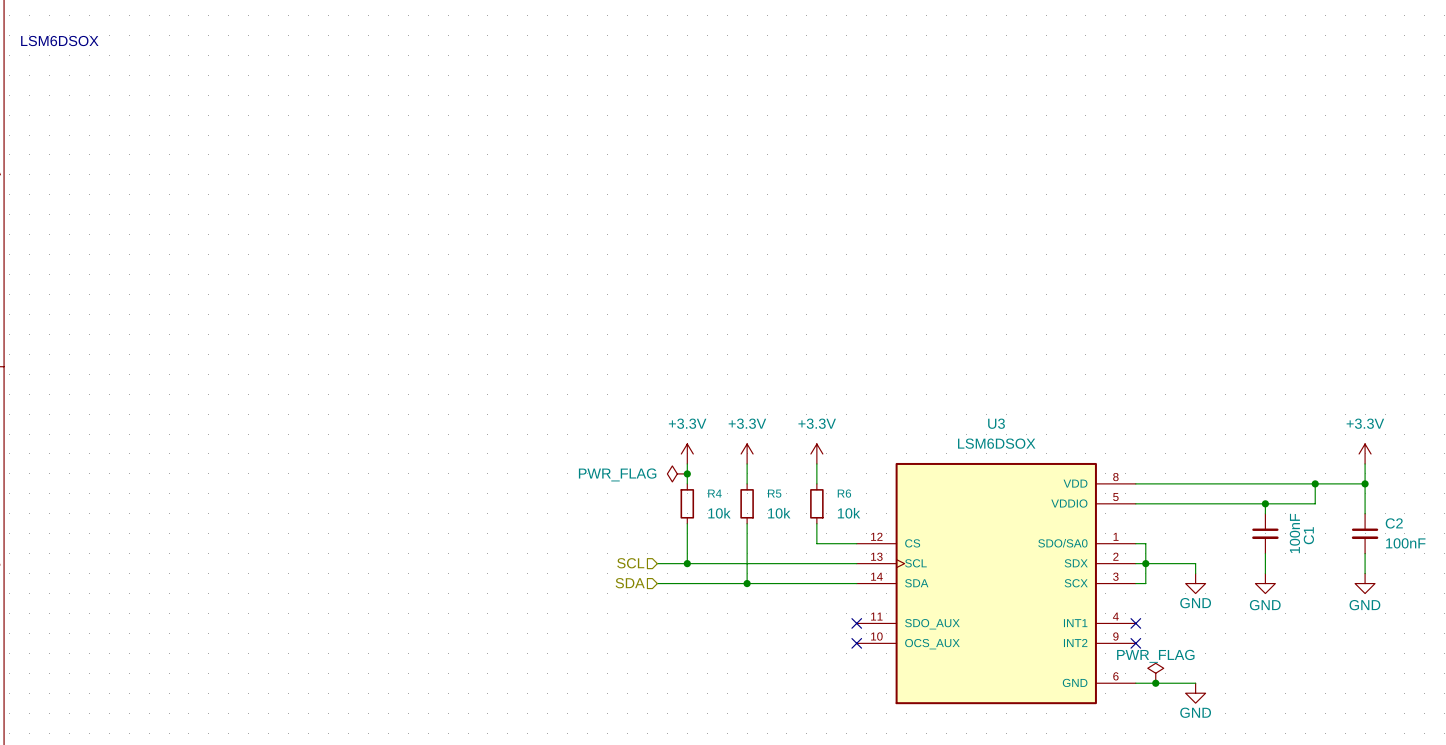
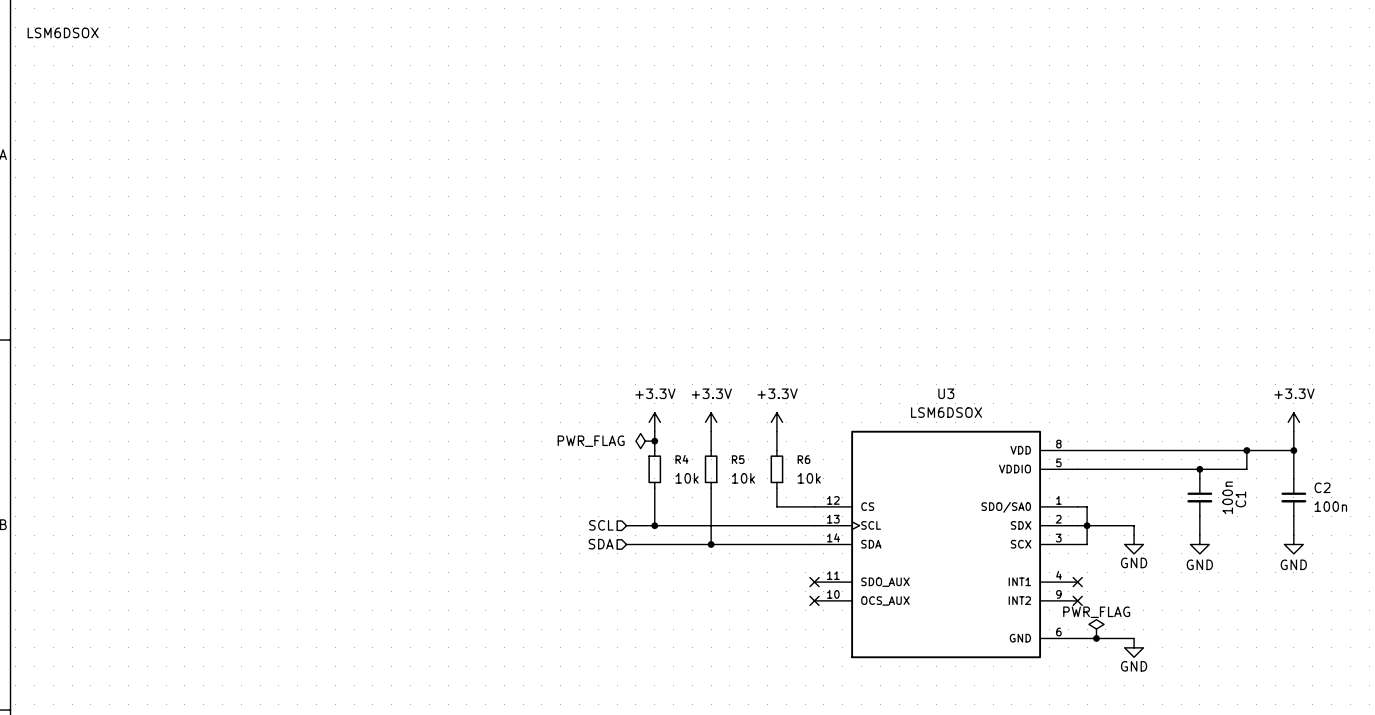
C1 value: 100nF (1294, 533) -> 100n (1227, 497)
C2 value: 100nF (1405, 543) -> 100n (1330, 506)

